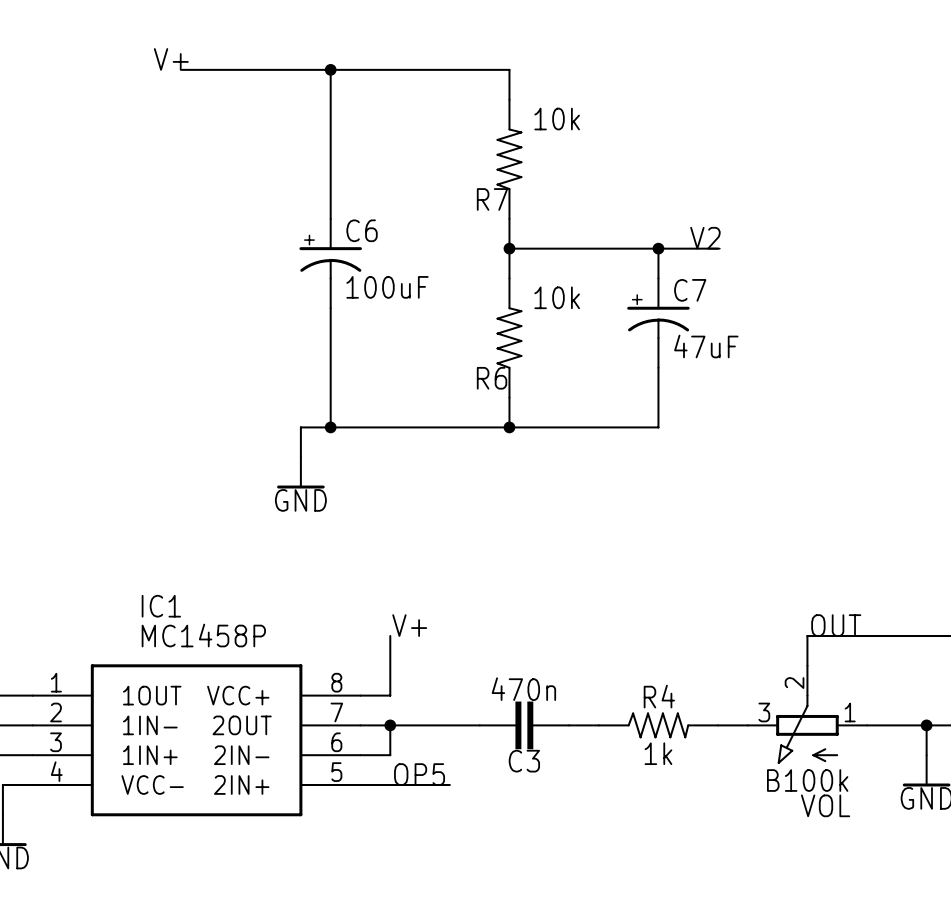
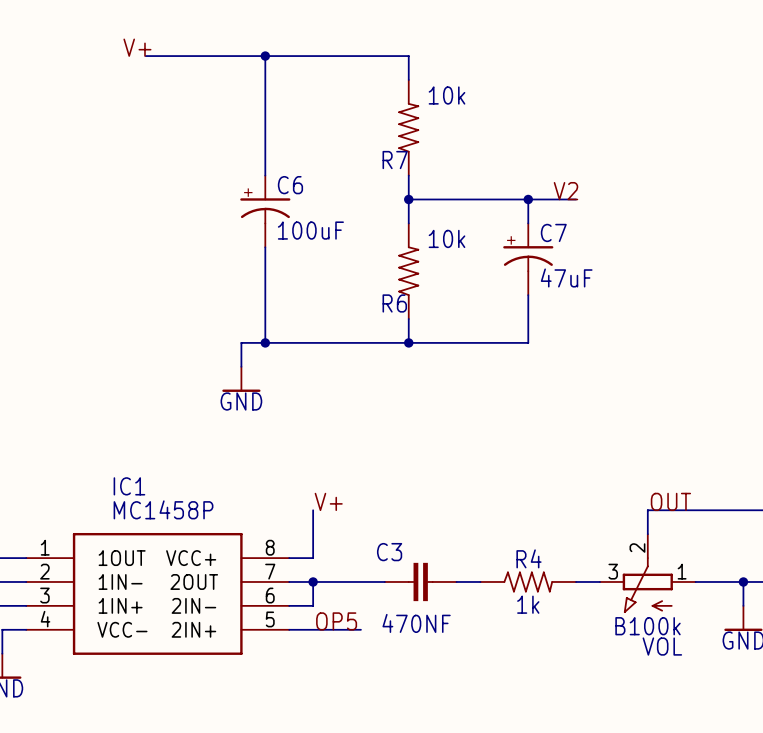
C3 value: 470n (523, 689) -> 470NF (416, 623)
C3 symbol: [478, 701, 570, 750] -> [384, 562, 457, 602]
C3 name position: C3 (524, 761) -> C3 (389, 552)

